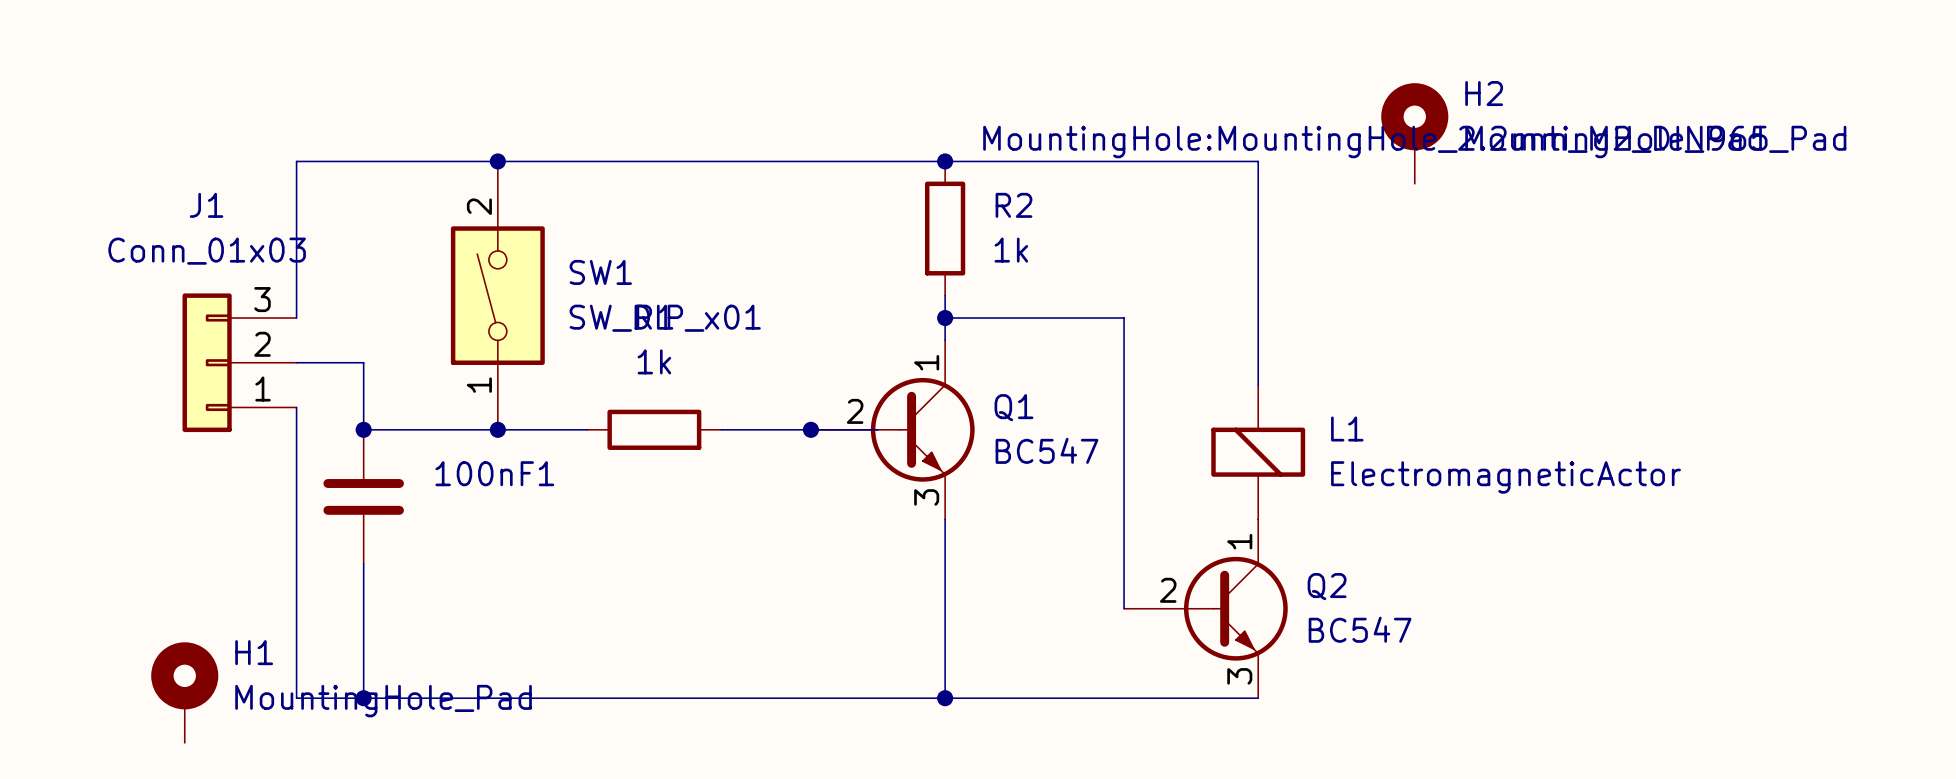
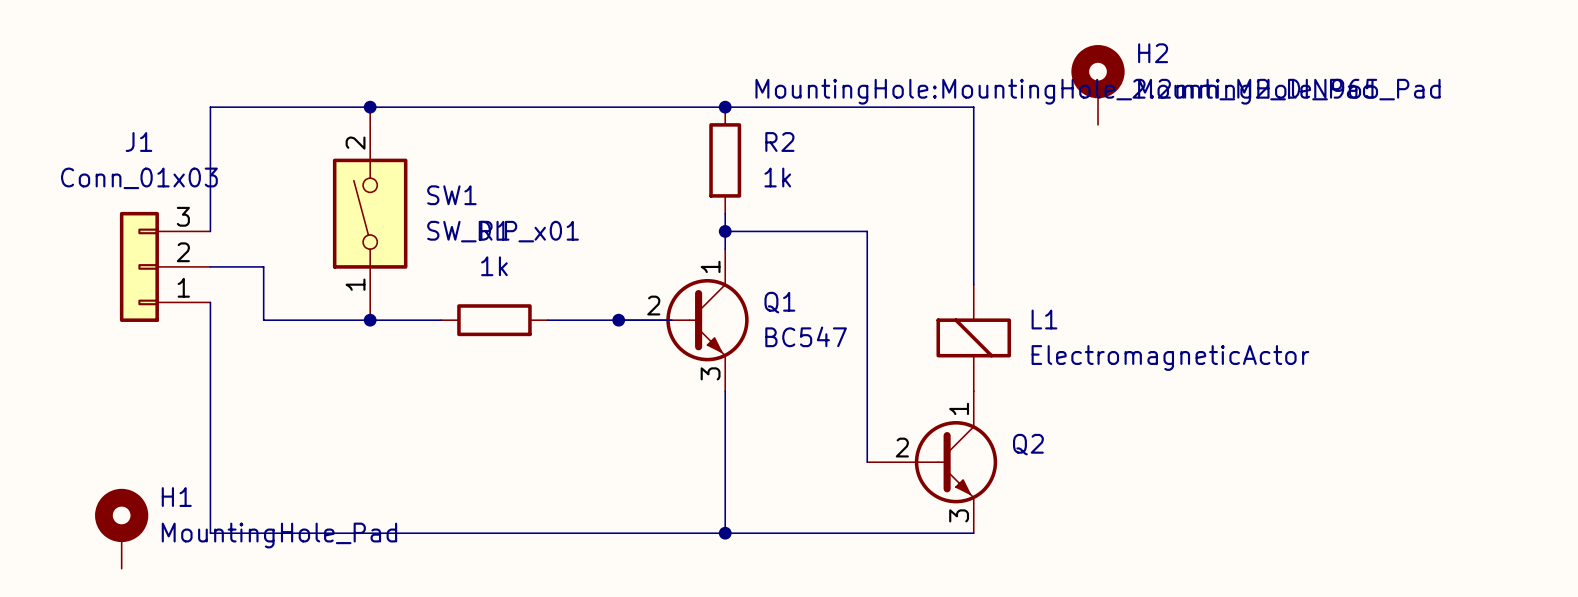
junction: (363, 429) -> none
100nF1: (363, 496) -> none
wire: (363, 564) (363, 698) -> none
Q2 value: BC547 (1360, 629) -> none
junction: (363, 698) -> none

